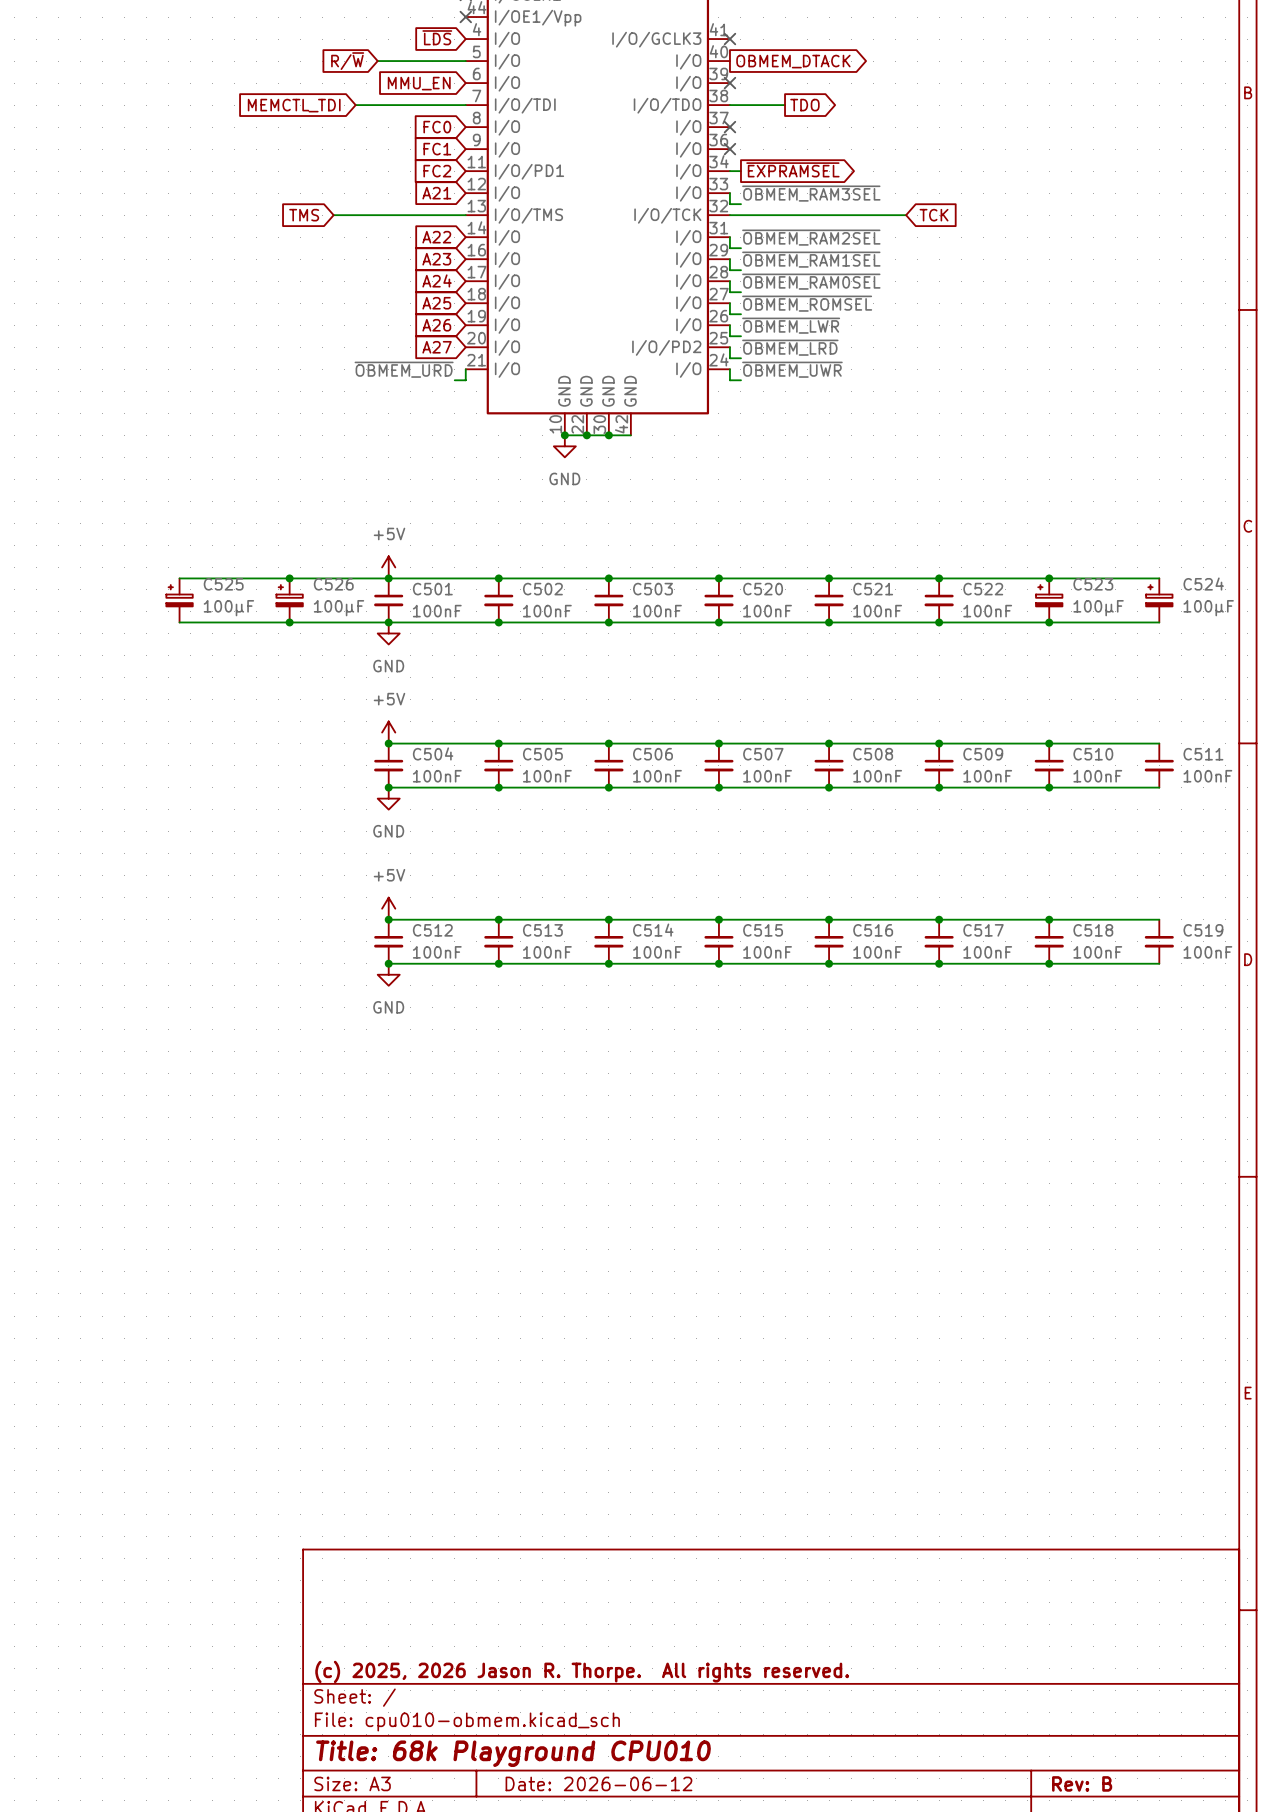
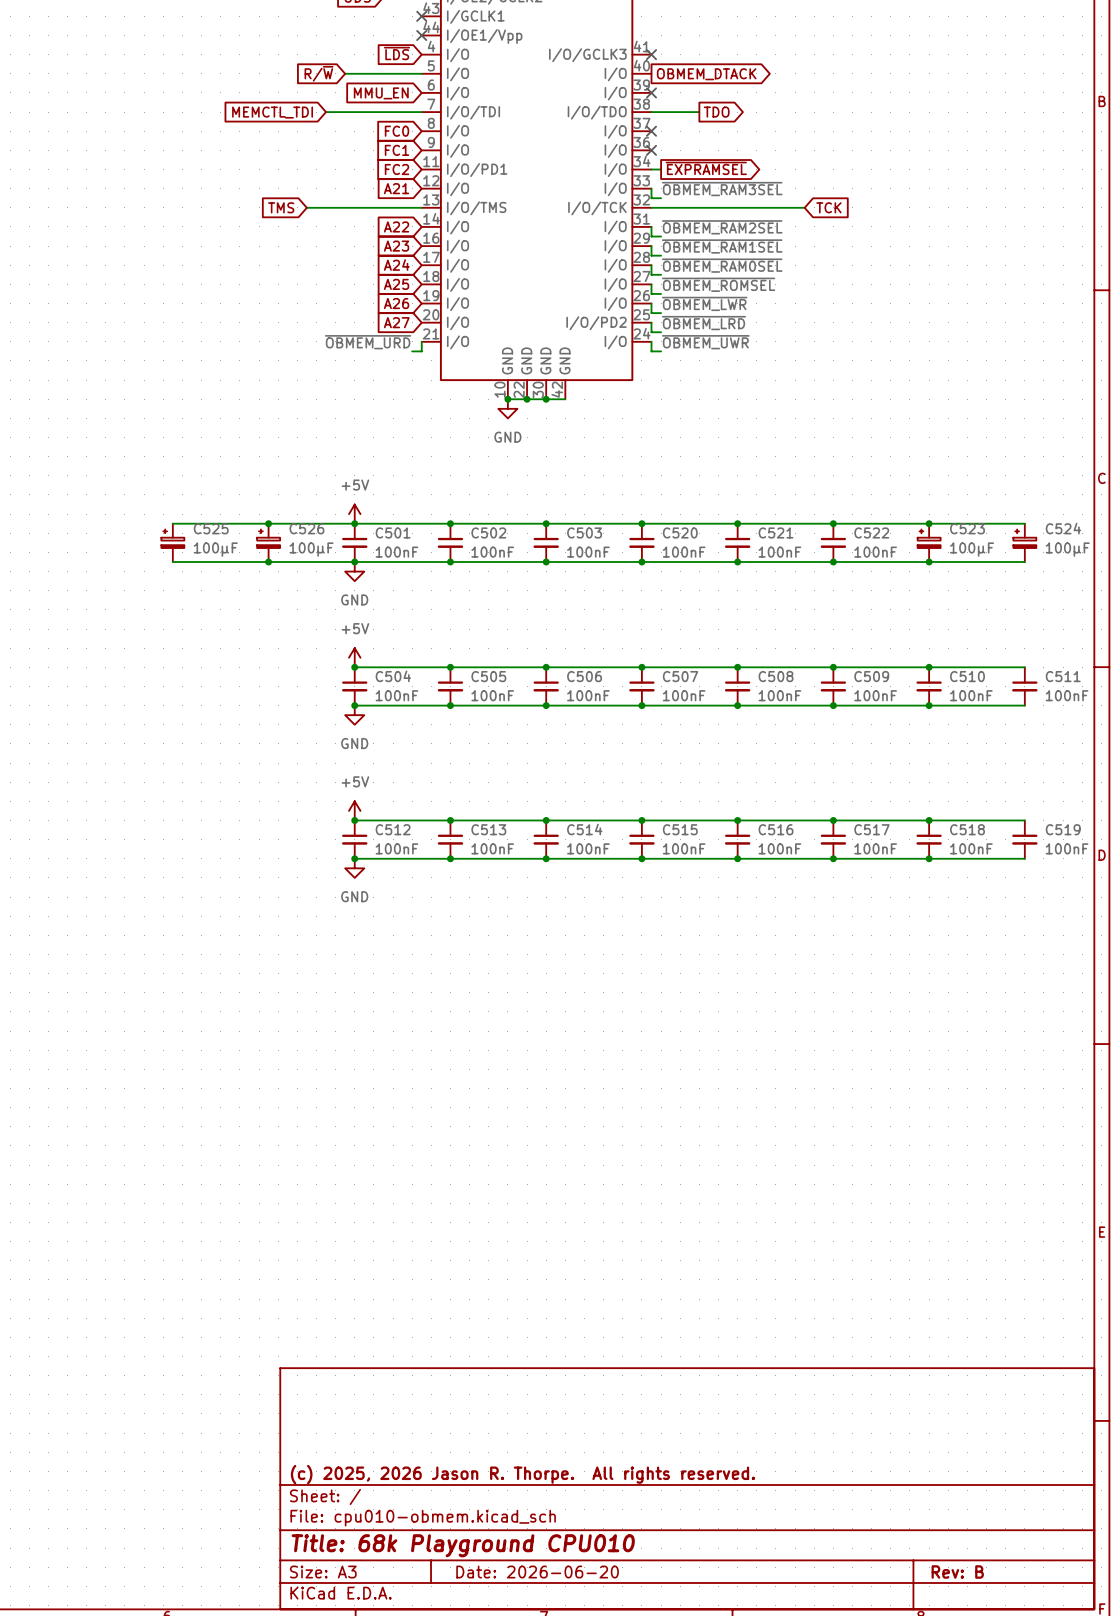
title block: Date: 2026-06-12 (598, 1783) -> Date: 2026-06-20 (537, 1572)

